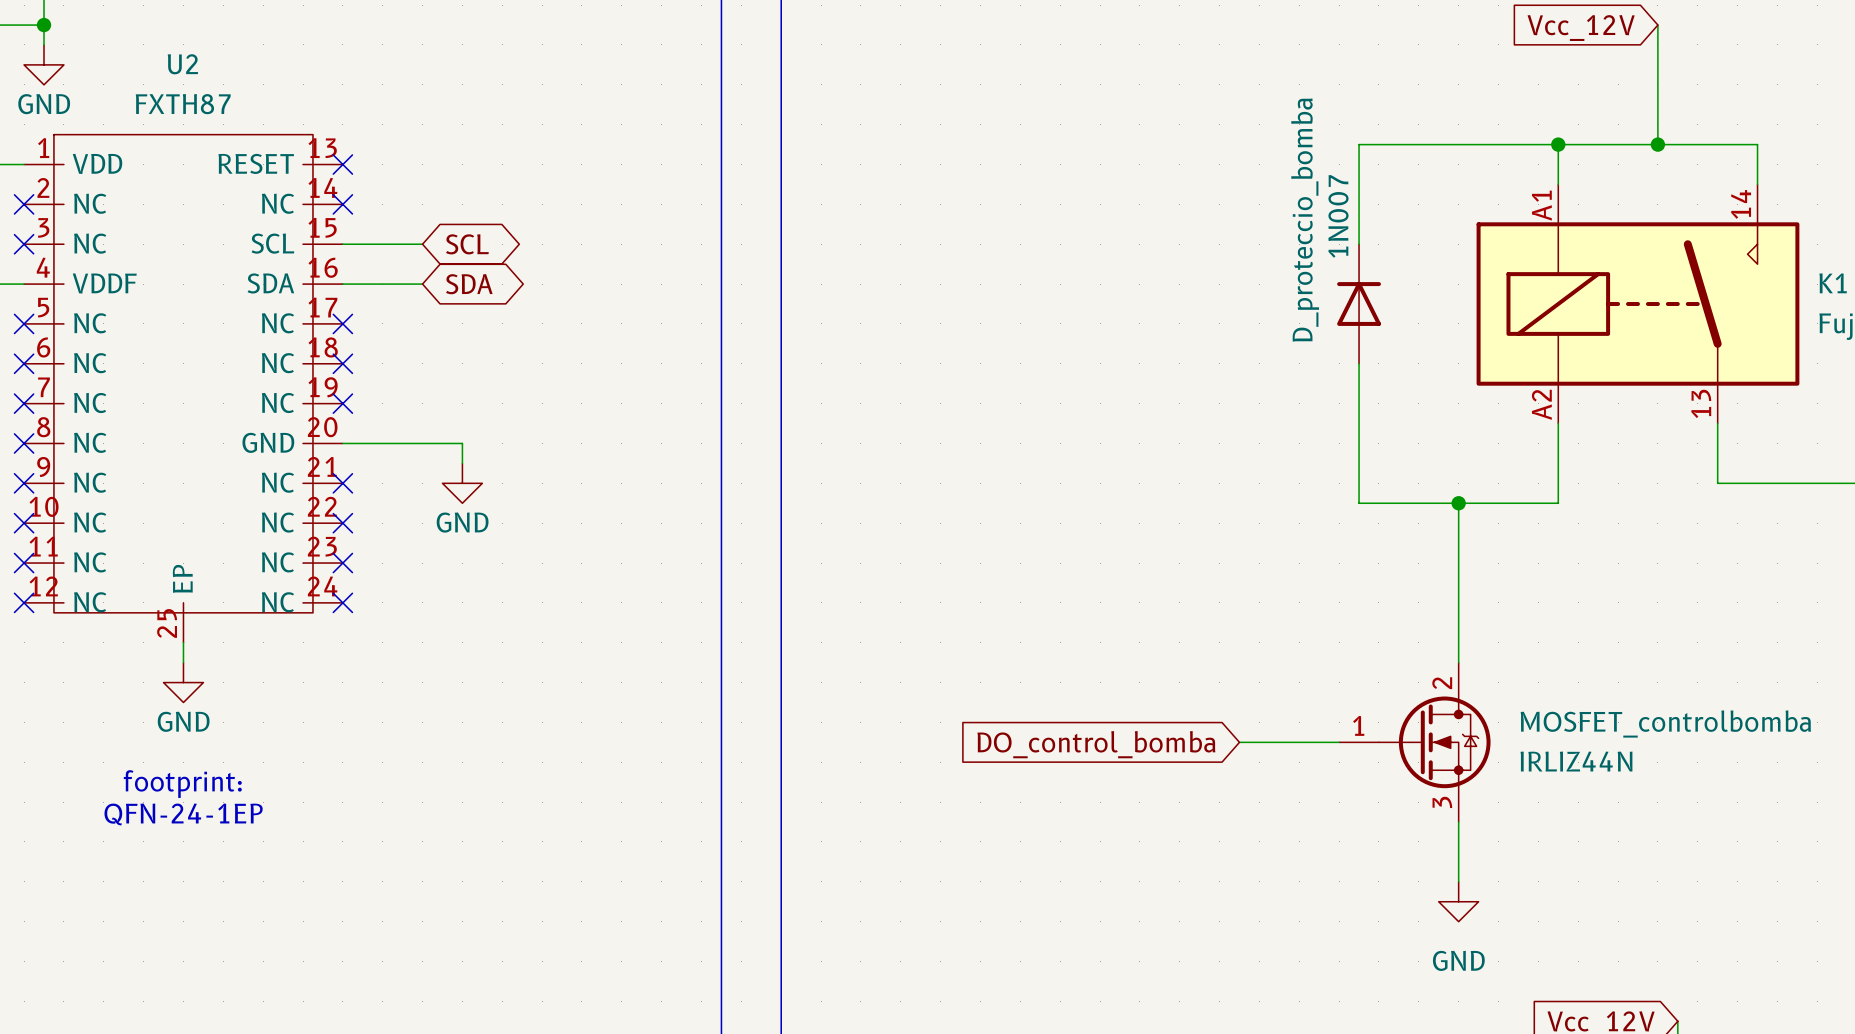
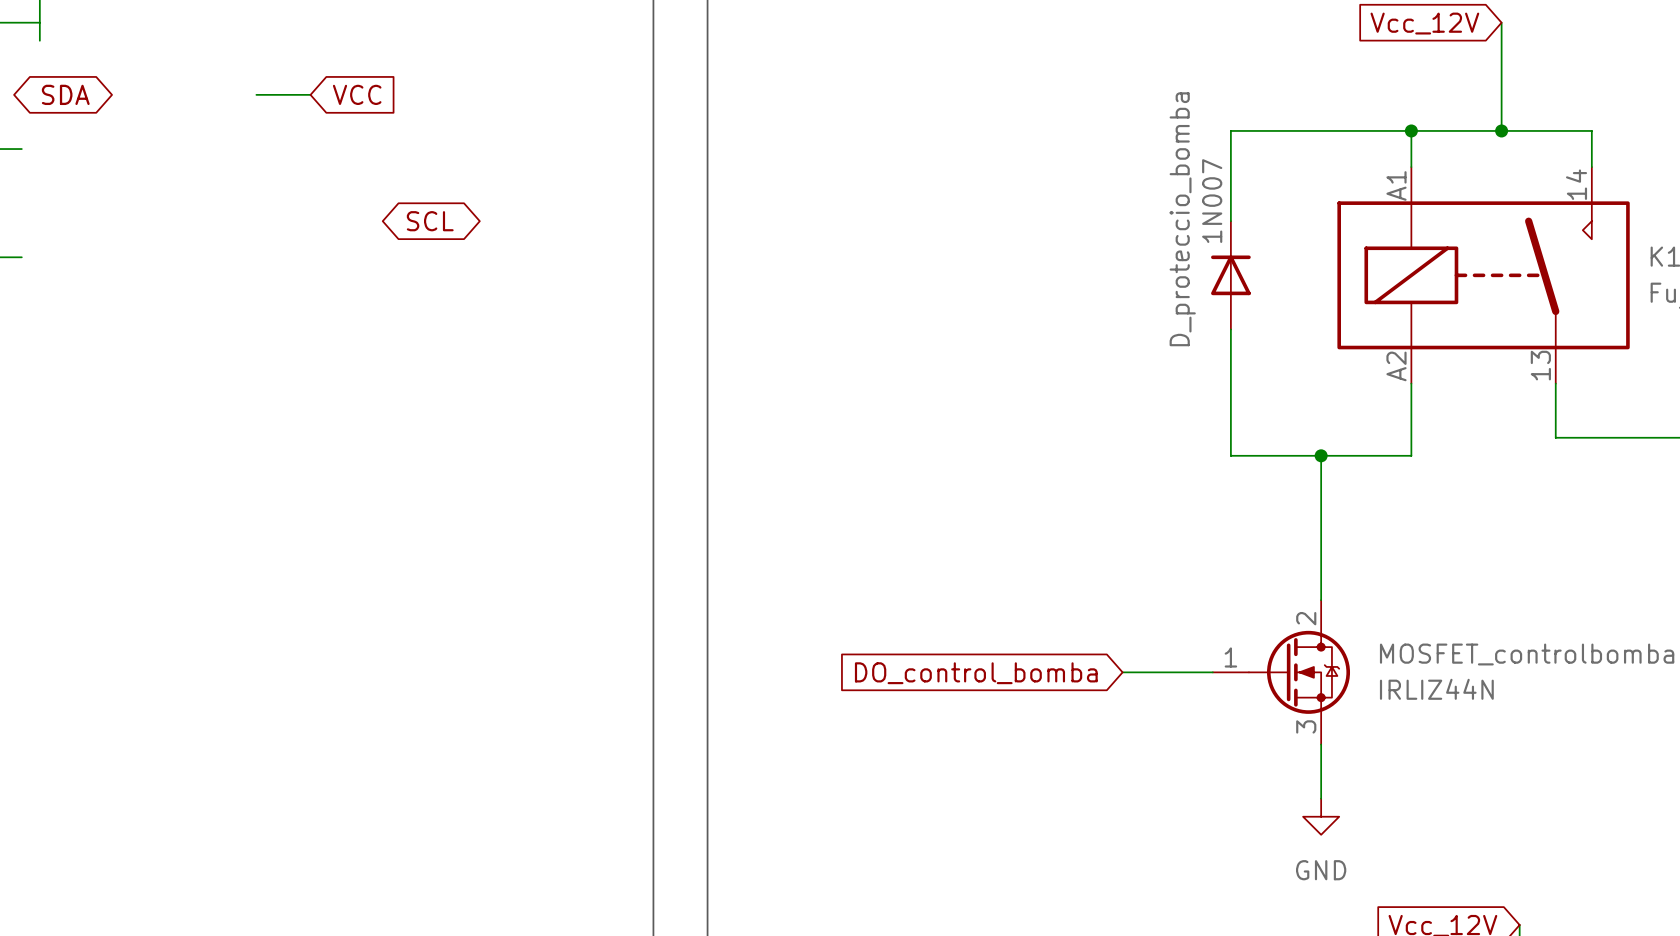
junction: (43, 25) -> none
power symbol: GND (43, 64) -> none
wire: none -> (256, 94) (310, 94)
global label: none -> VCC (357, 94)
no-connect mark: (342, 164) -> none
no-connect mark: (24, 204) -> none
no-connect mark: (342, 204) -> none
no-connect mark: (24, 244) -> none
wire: (342, 244) (422, 244) -> none
wire: (342, 284) (422, 284) -> none
global label rotation: 0° (469, 284) -> 180° (65, 94)
global label position: SDA (469, 284) -> SDA (65, 94)
no-connect mark: (24, 323) -> none
no-connect mark: (342, 323) -> none
no-connect mark: (24, 363) -> none
no-connect mark: (342, 363) -> none
U2: FXTH87 (183, 388) -> none
no-connect mark: (24, 403) -> none
no-connect mark: (342, 403) -> none
no-connect mark: (24, 443) -> none
wire: (342, 443) (462, 443) (462, 463) -> none
no-connect mark: (24, 483) -> none
no-connect mark: (342, 483) -> none
power symbol: GND (462, 483) -> none
no-connect mark: (24, 523) -> none
no-connect mark: (342, 523) -> none
no-connect mark: (24, 563) -> none
no-connect mark: (342, 563) -> none
no-connect mark: (24, 602) -> none
no-connect mark: (342, 602) -> none
wire: (183, 642) (183, 662) -> none
power symbol: GND (183, 682) -> none
text: footprint: (182, 784) -> none
text: QFN-24-1EP (183, 814) -> none

